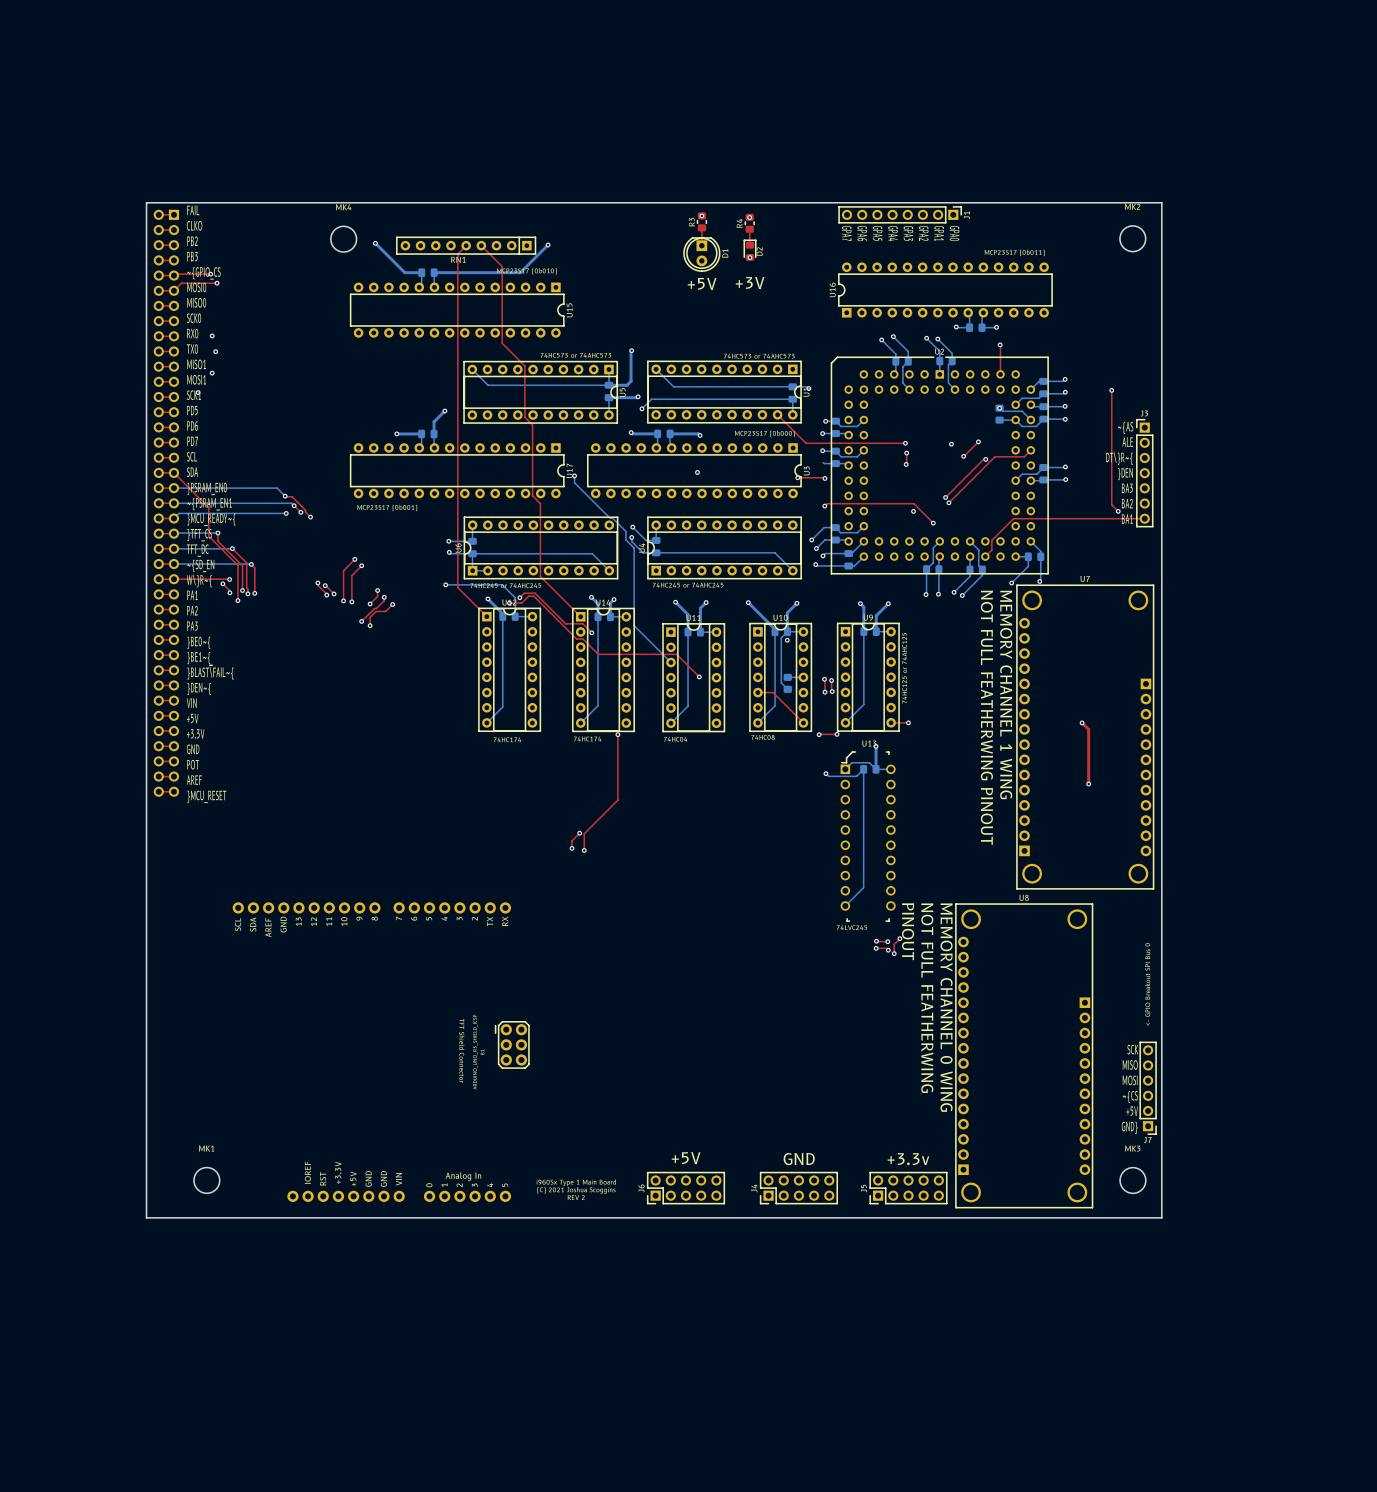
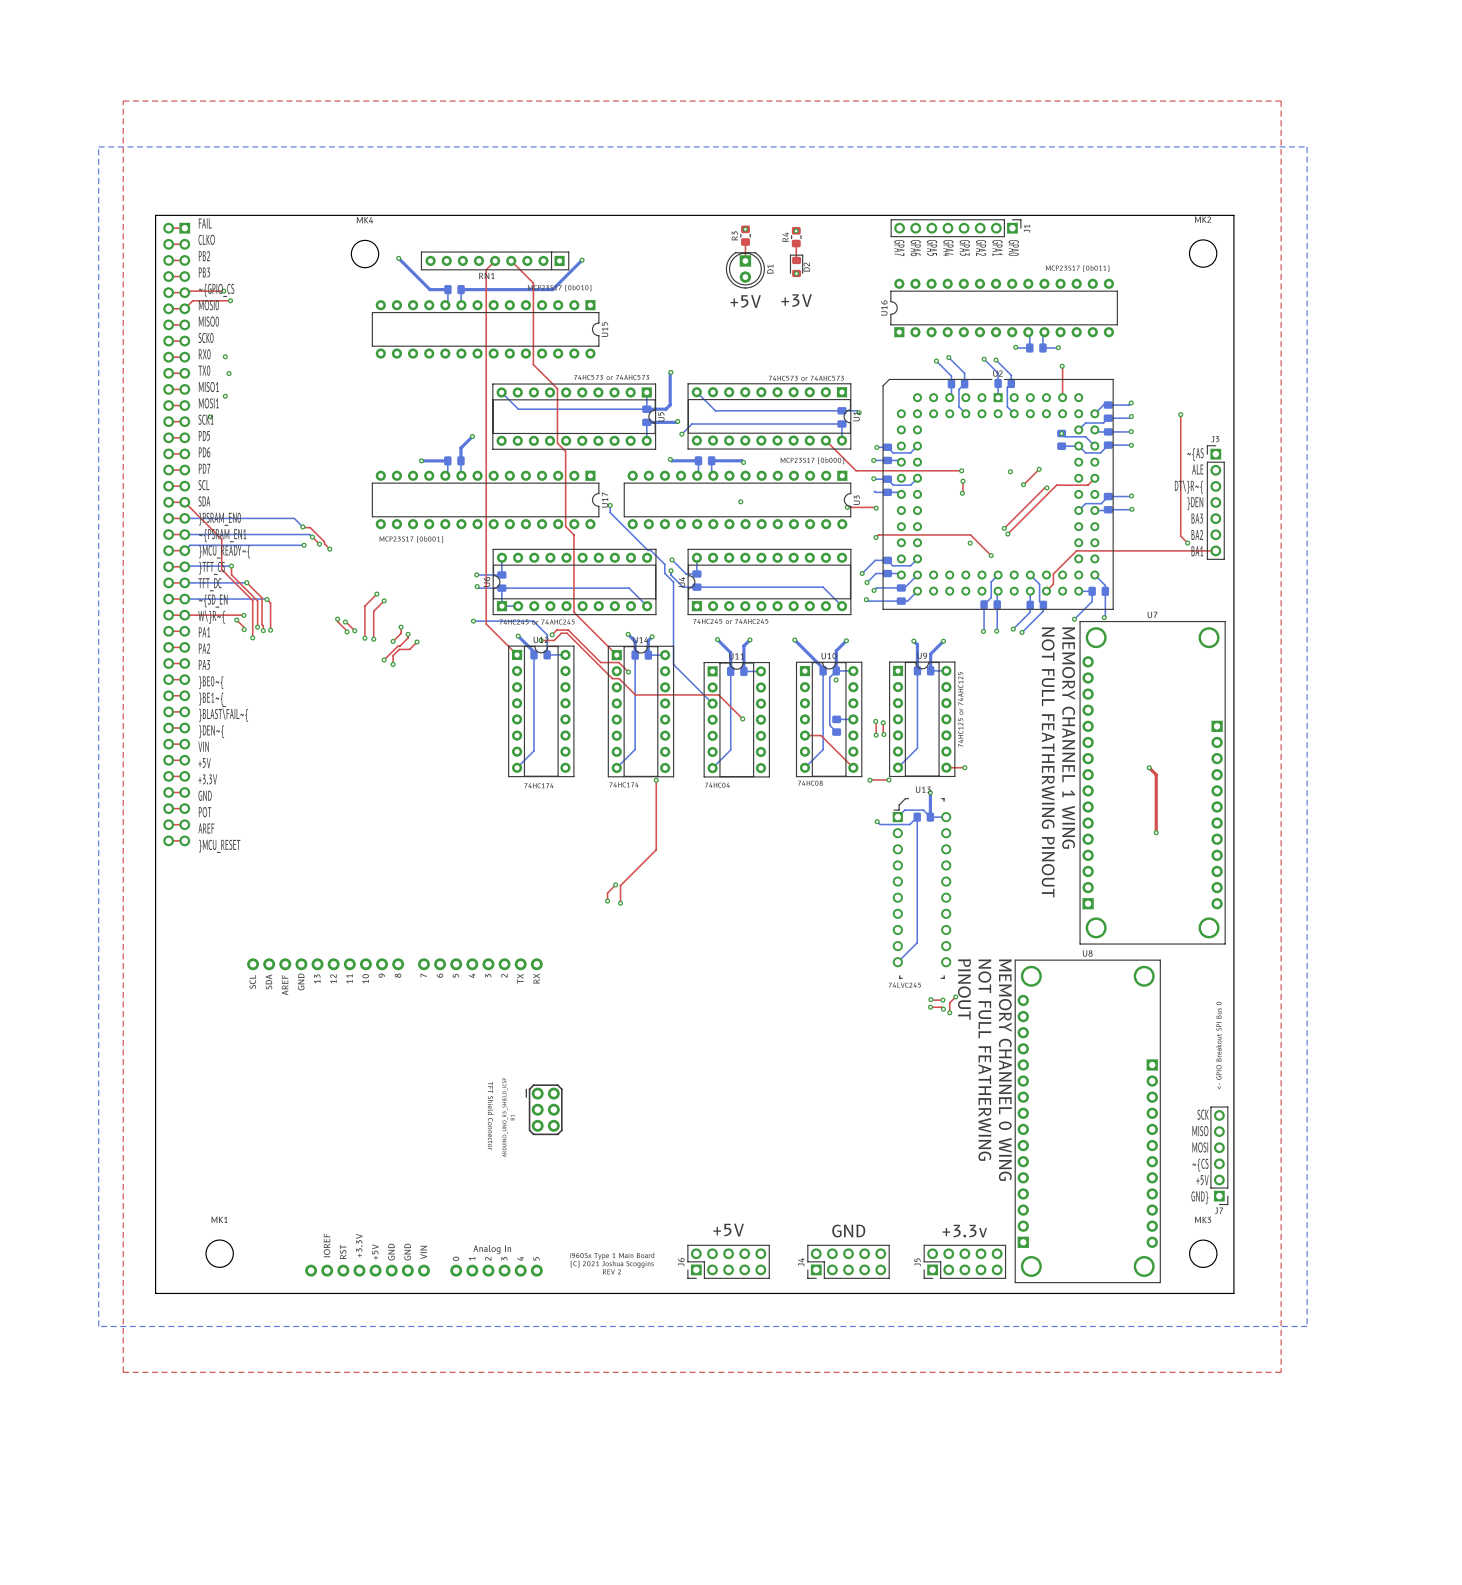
top zone outline: none -> (123, 101) (123, 1372) (1281, 1372) (1281, 101) (123, 101)
bottom zone outline: none -> (98, 146) (98, 1326) (1307, 1326) (1307, 146) (98, 146)

